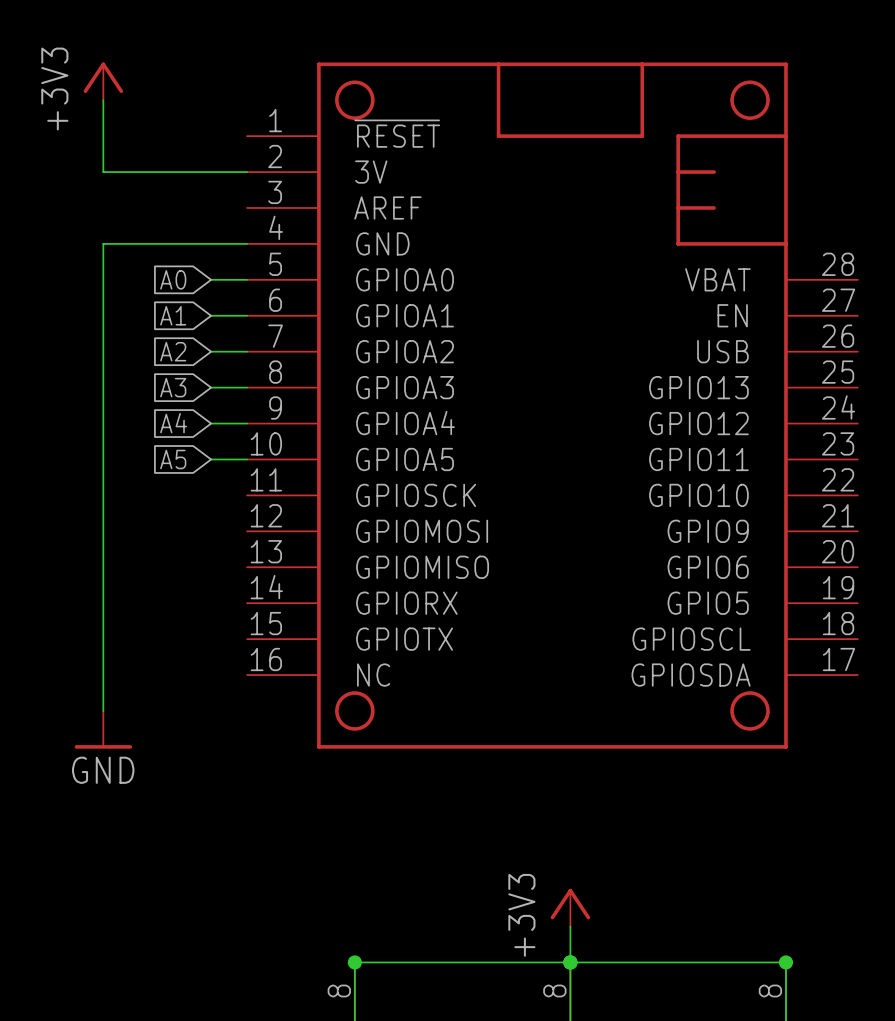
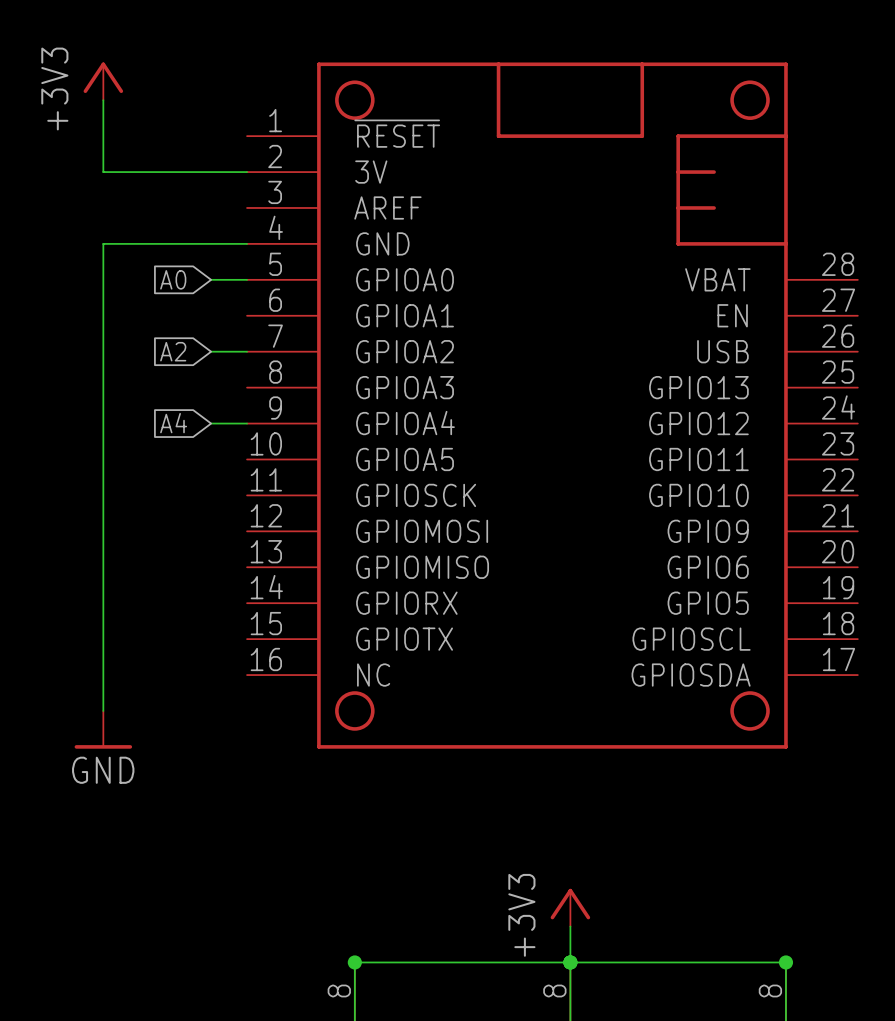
global label: A1 (173, 315) -> none
wire: (211, 315) (247, 315) -> none
global label: A3 (173, 387) -> none
wire: (211, 387) (247, 387) -> none
global label: A5 (173, 459) -> none
wire: (211, 459) (247, 459) -> none

